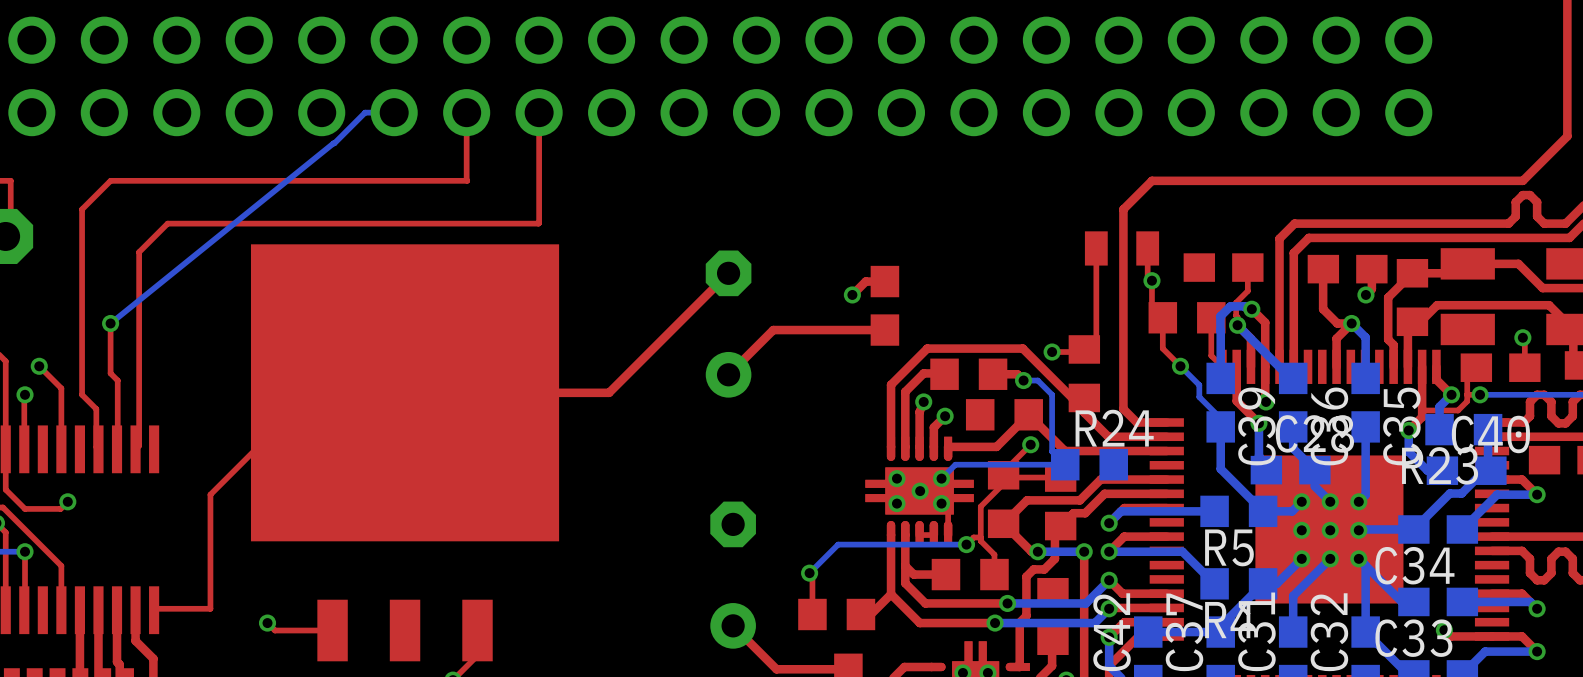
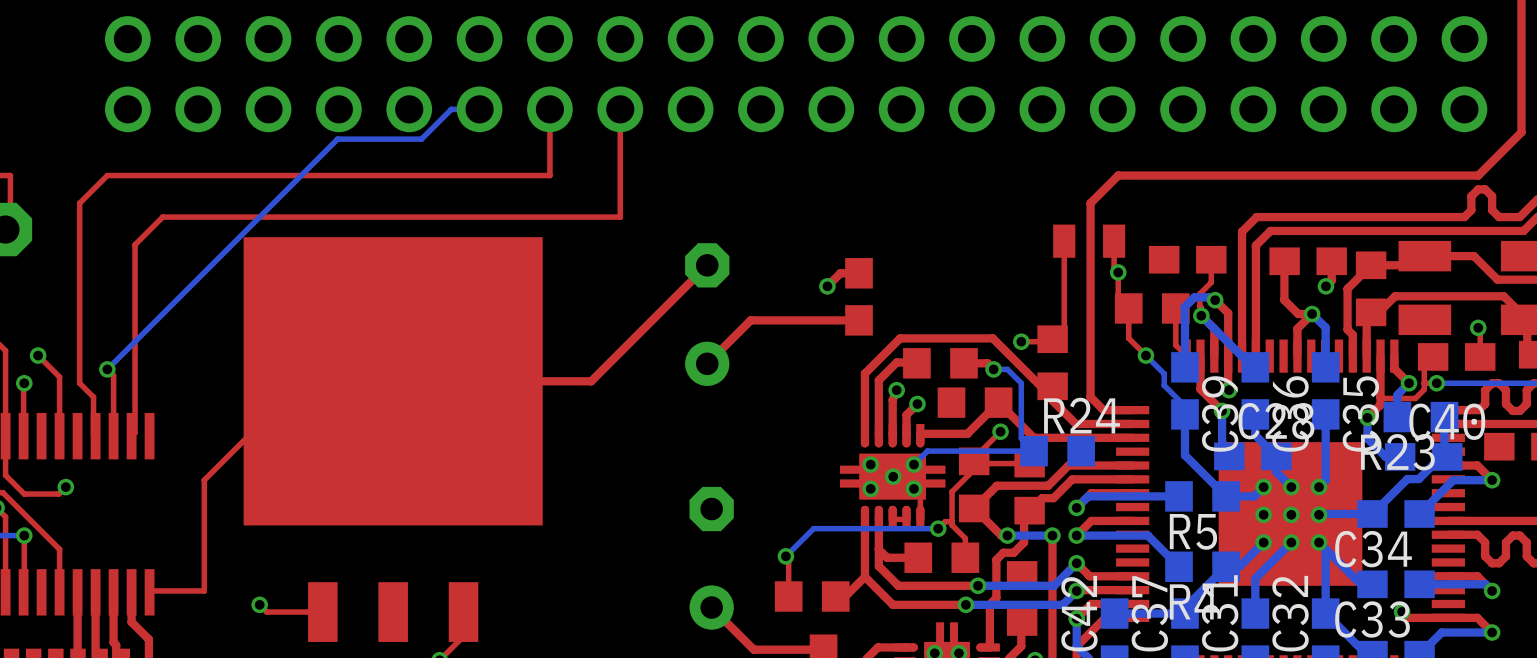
part position: (720, 76) -> (796, 74)
bottom track: (394, 112) (365, 112) (334, 143) (110, 323) -> none
top track: (466, 112) (467, 180) -> (549, 109) (549, 175) (453, 175)
bottom track: none -> (479, 109) (451, 109) (421, 139) (337, 139) (107, 369)
top track: (539, 112) (538, 223) -> (620, 109) (620, 217) (522, 217)
top track: (110, 323) (110, 373) (117, 380) (117, 449) -> (107, 369) (113, 375) (113, 436)
via position: (110, 323) -> (107, 369)

